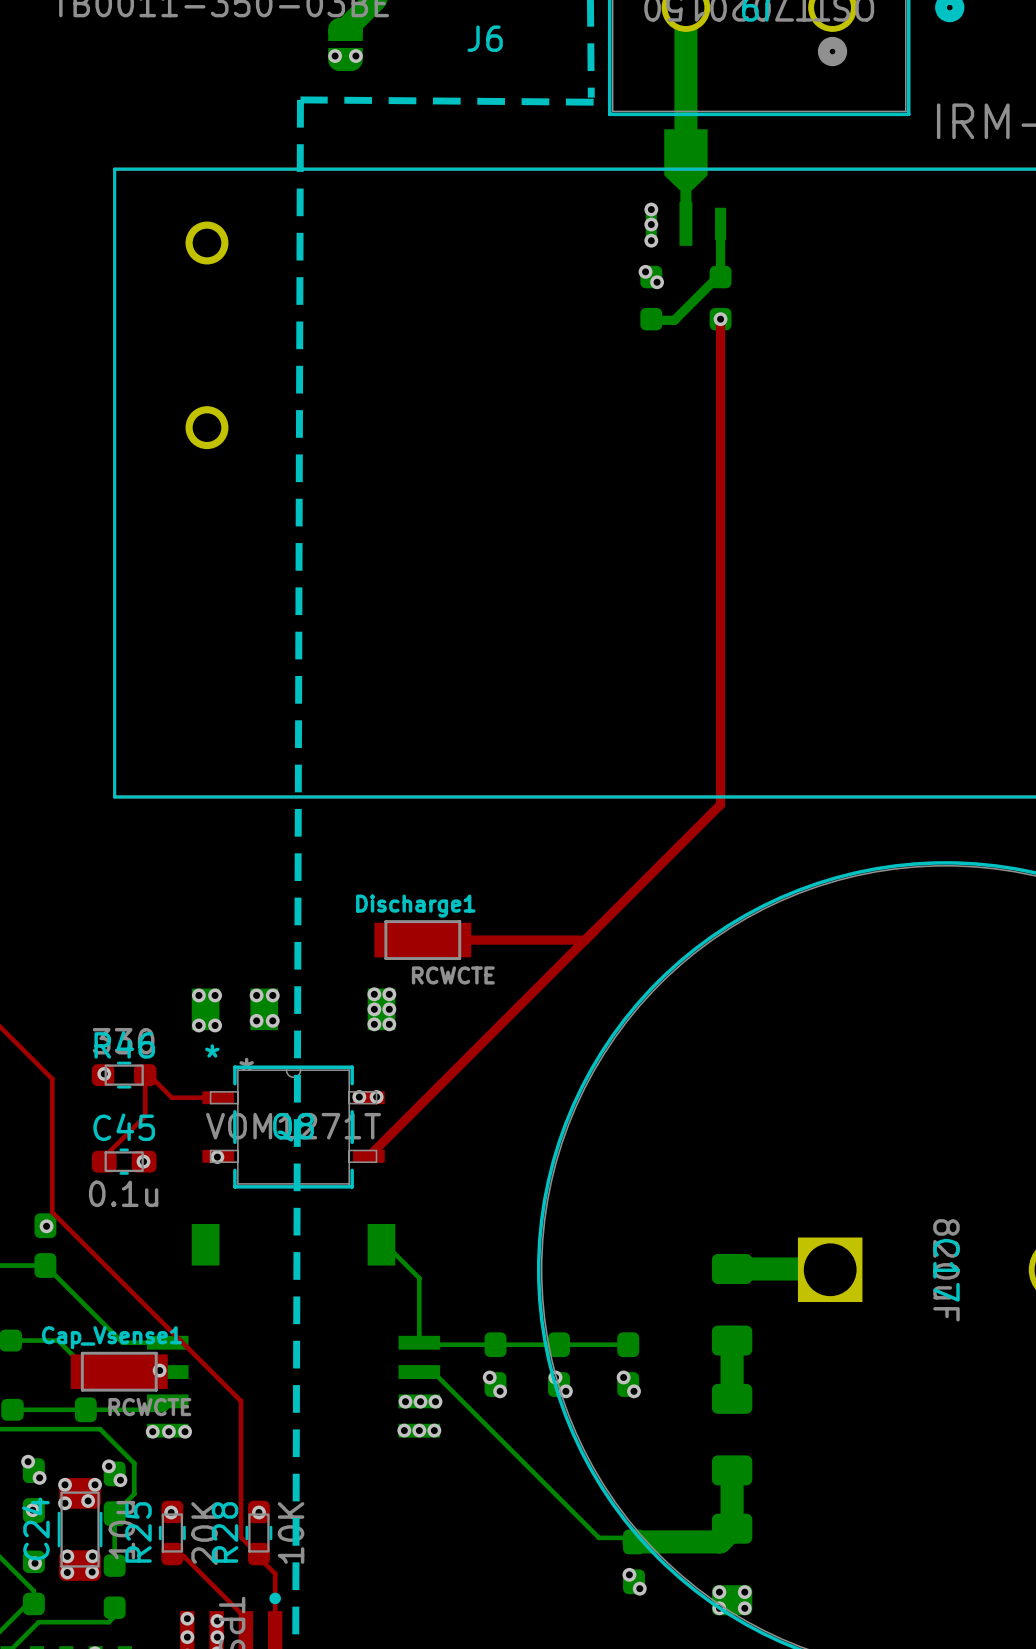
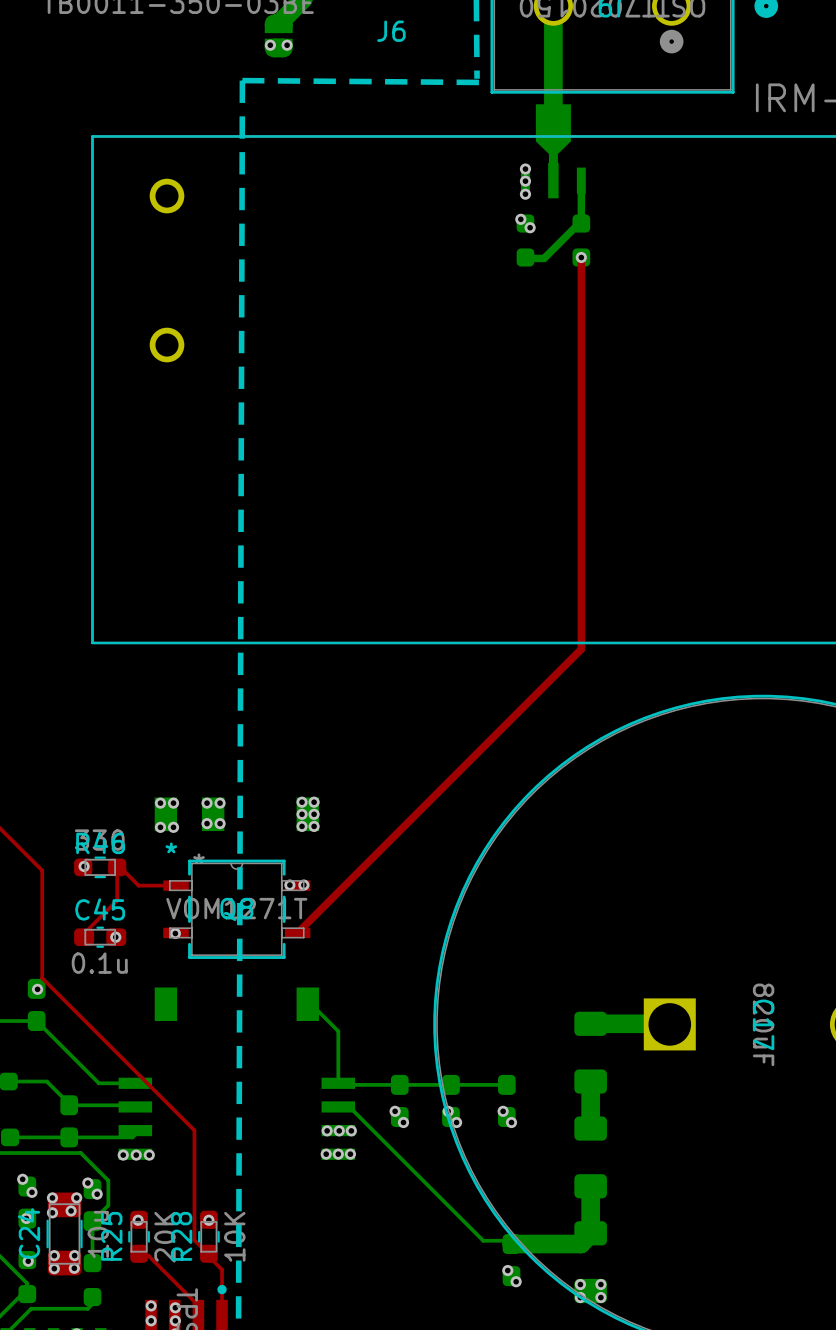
top track: (422, 940) (585, 940) -> none
Discharge1: RCWCTE (422, 940) -> none
via: (159, 1370) -> none
Cap_Vsense1: RCWCTE (119, 1371) -> none

